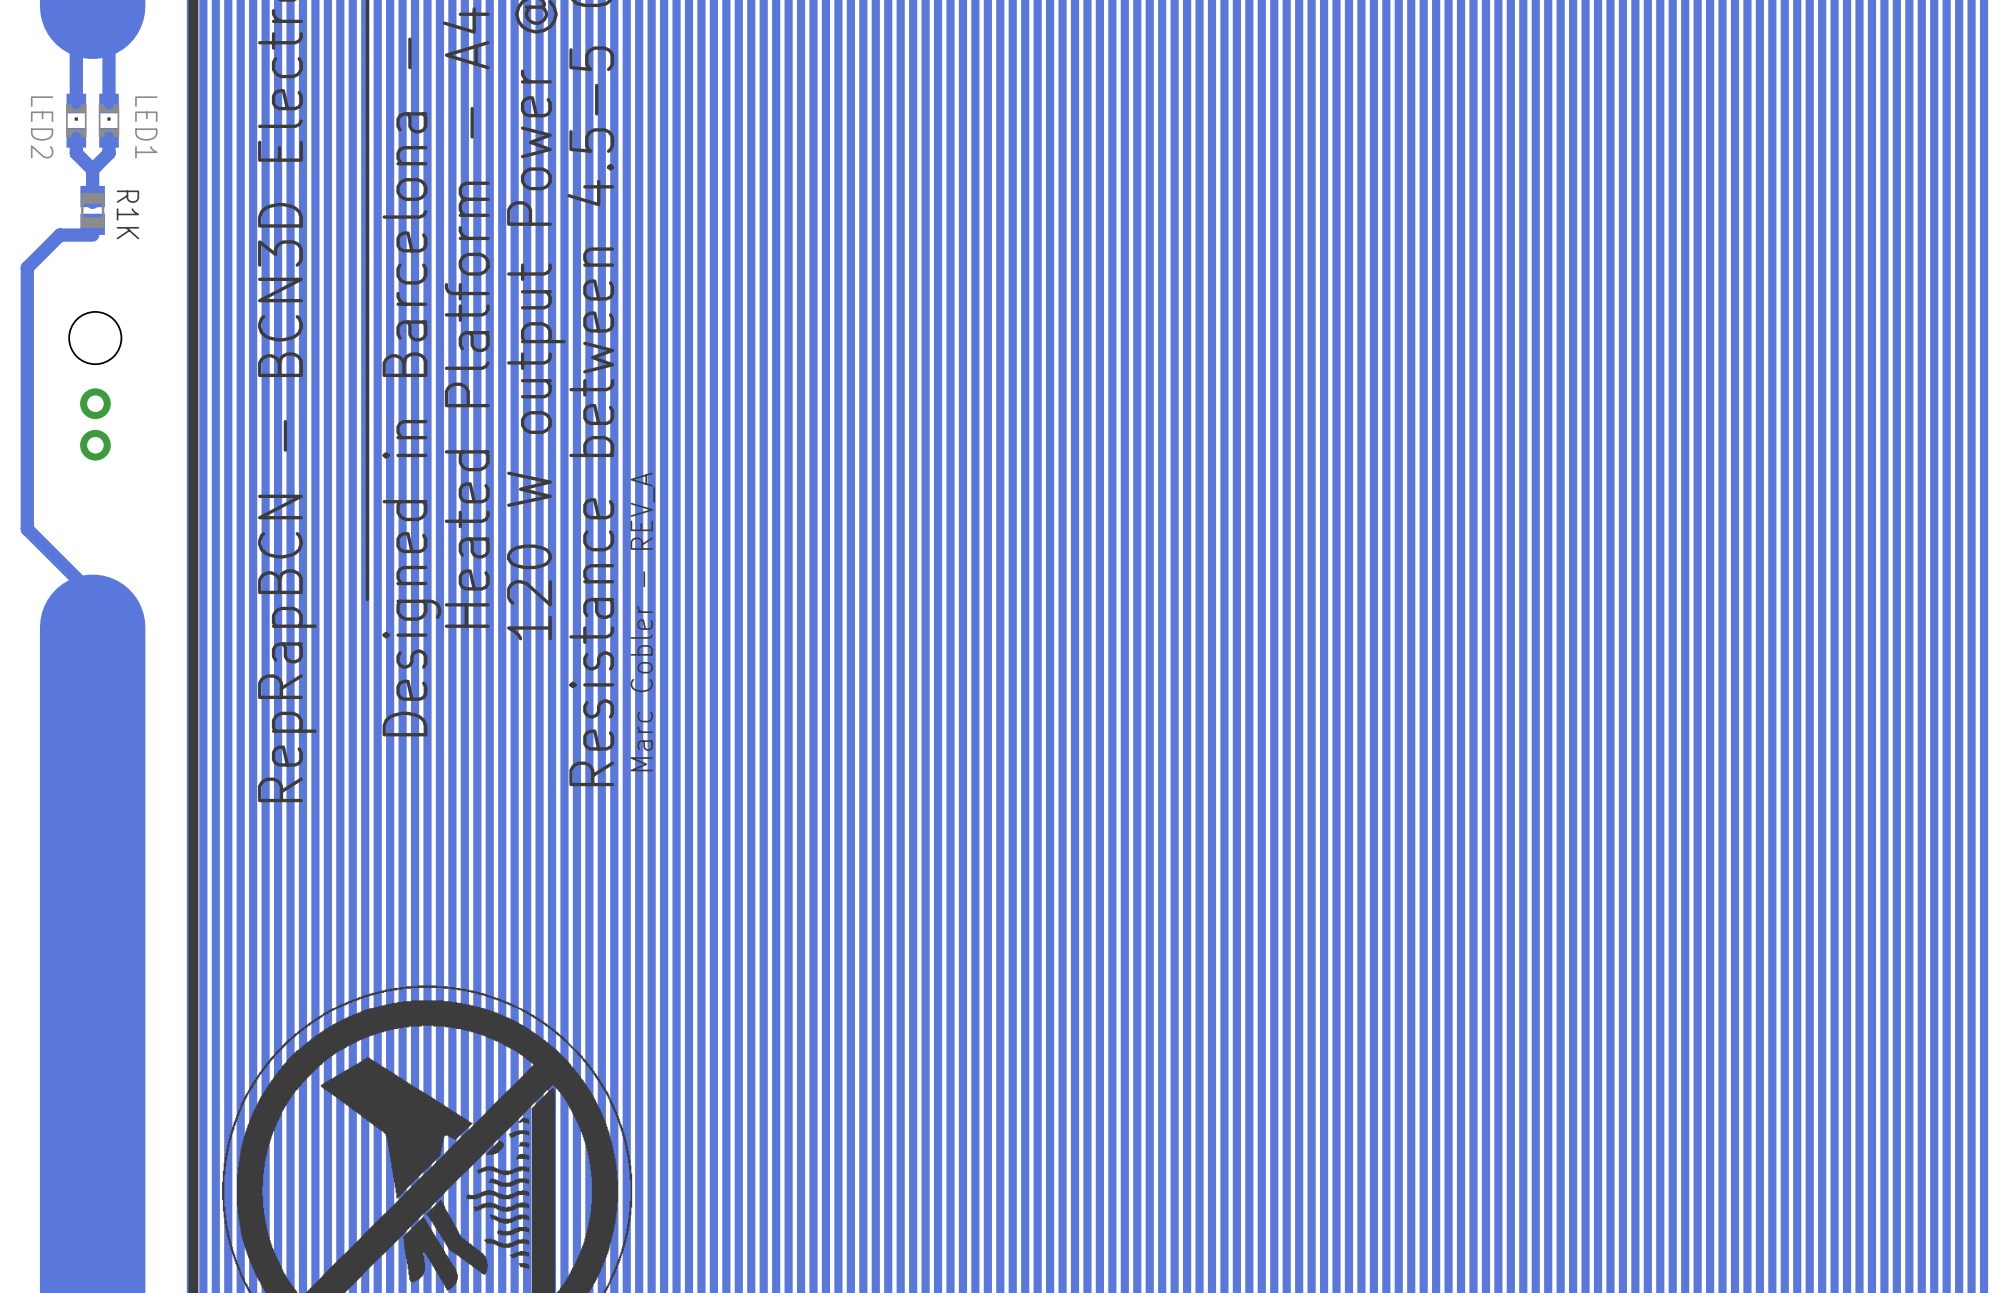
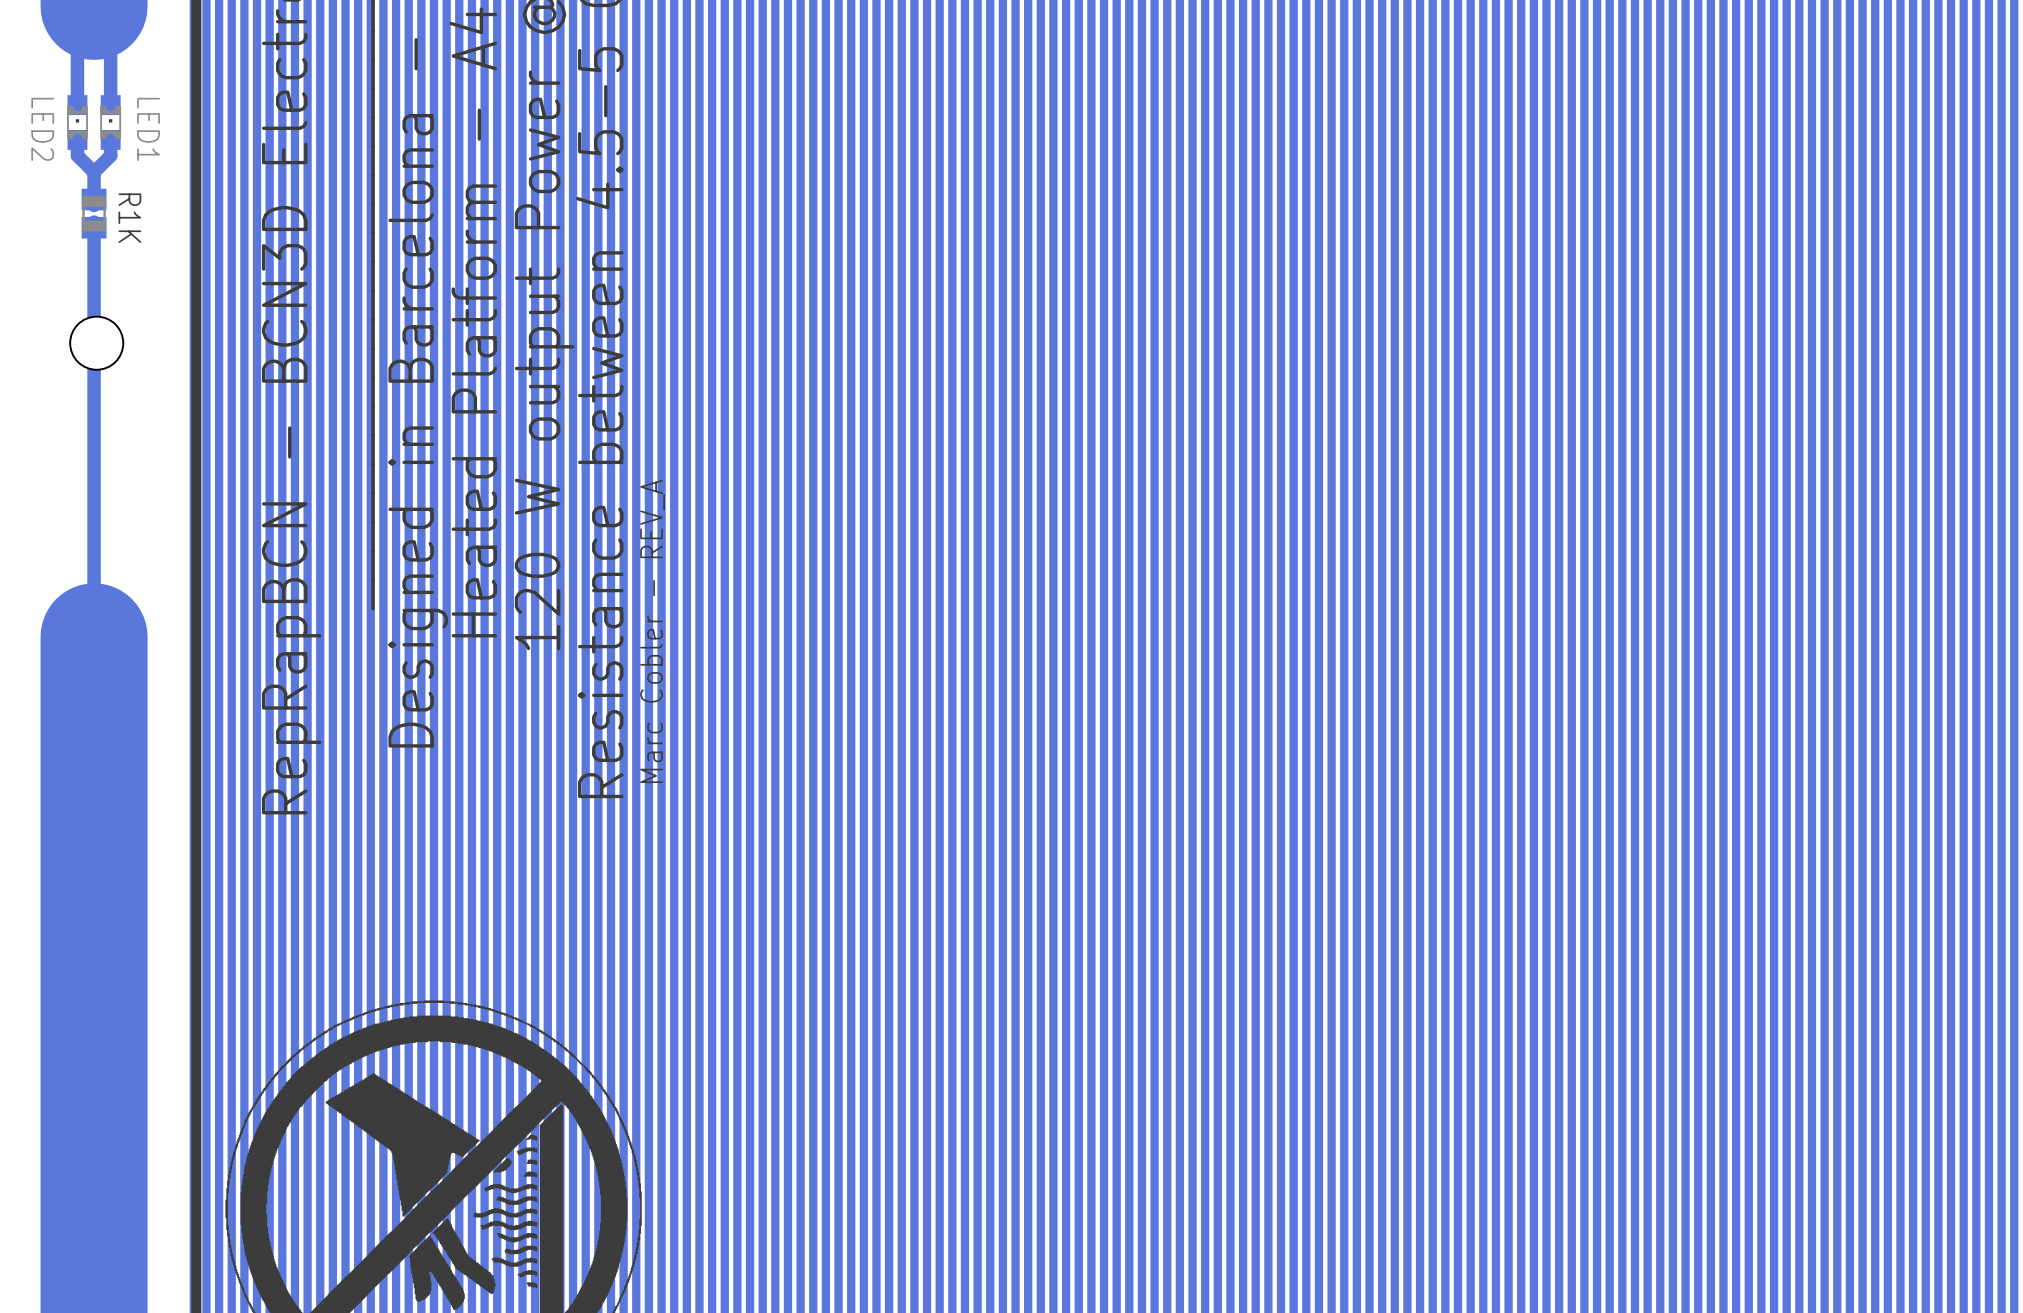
track: (92, 235) (59, 235) (27, 267) (27, 529) (92, 594) -> (94, 222) (94, 603)
part: (95, 424) -> none

